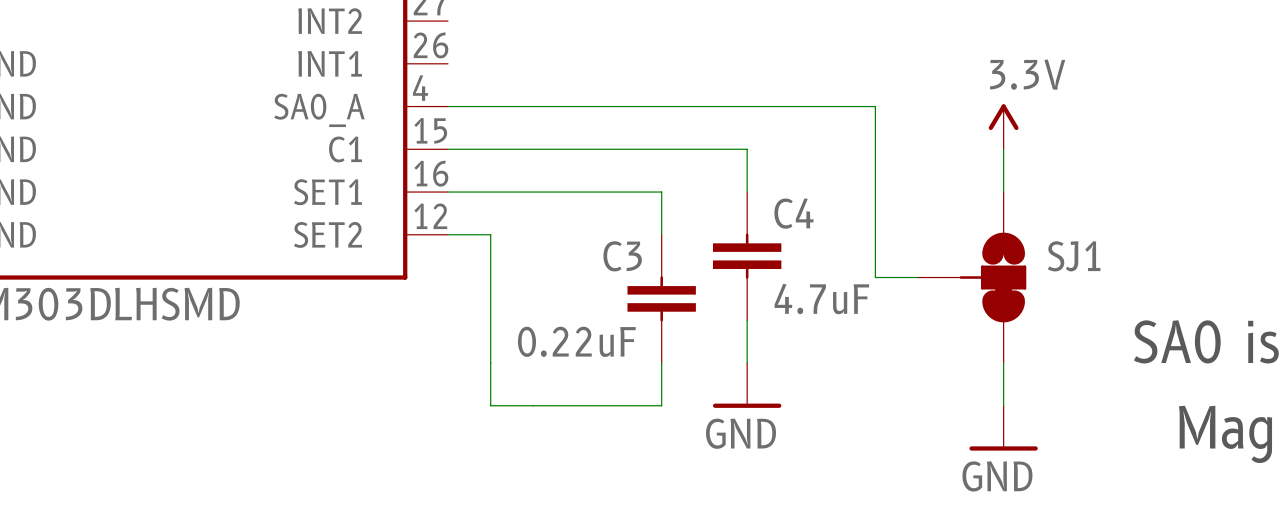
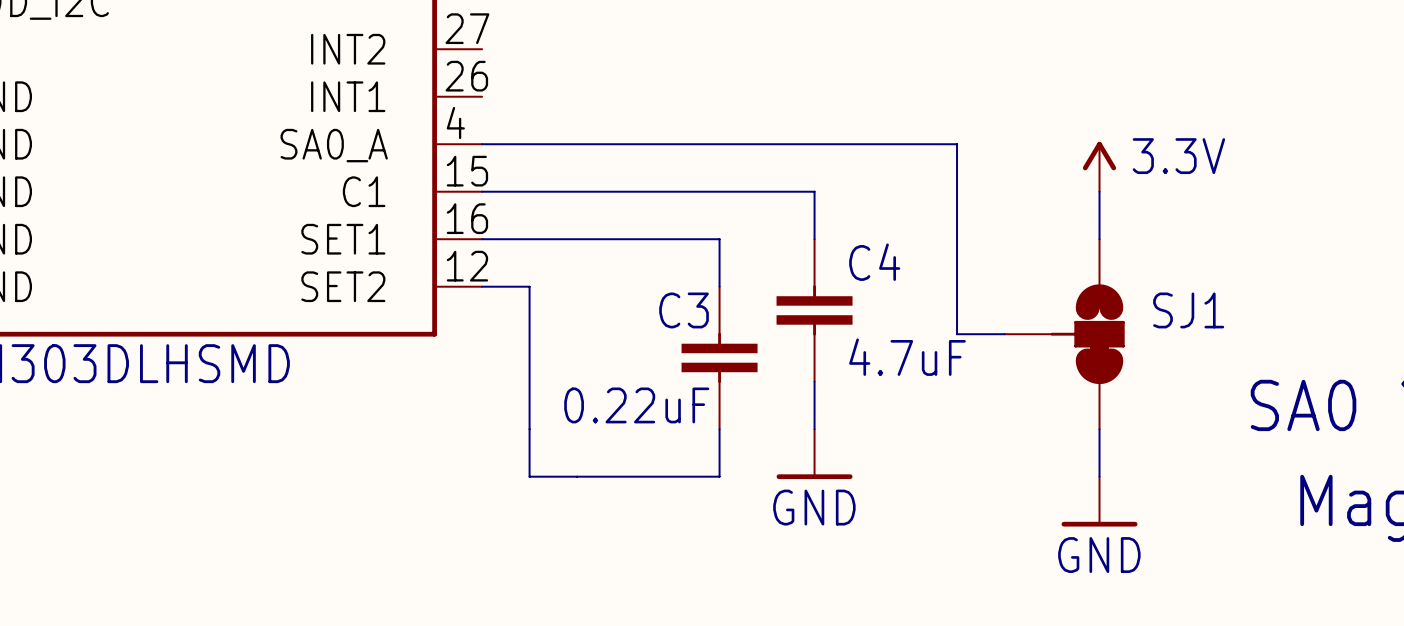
power symbol text position: 3.3V (1027, 74) -> 3.3V (1178, 156)

